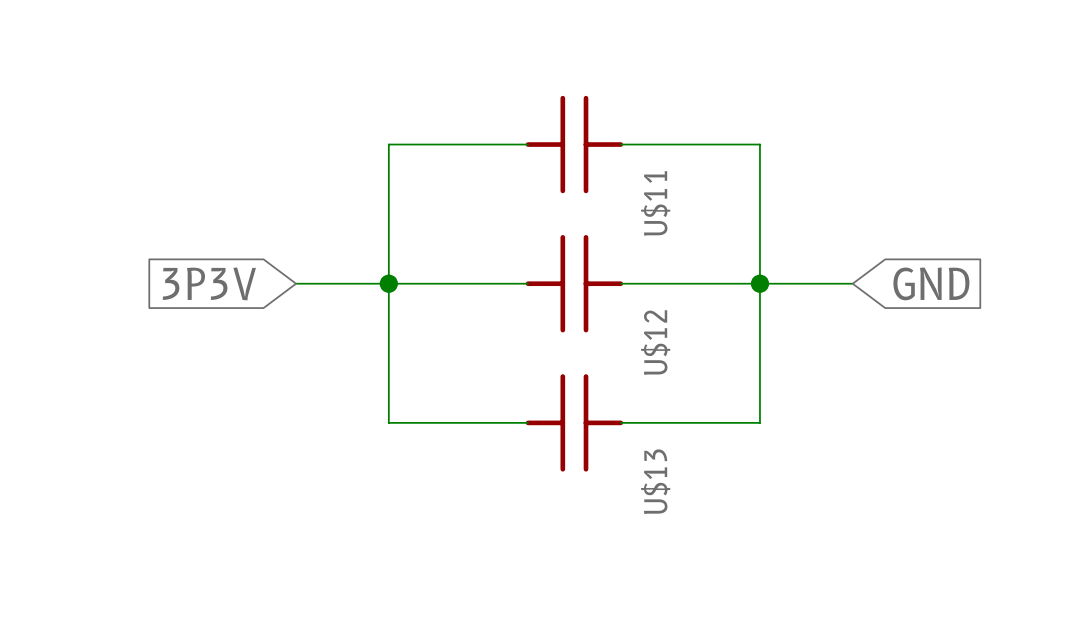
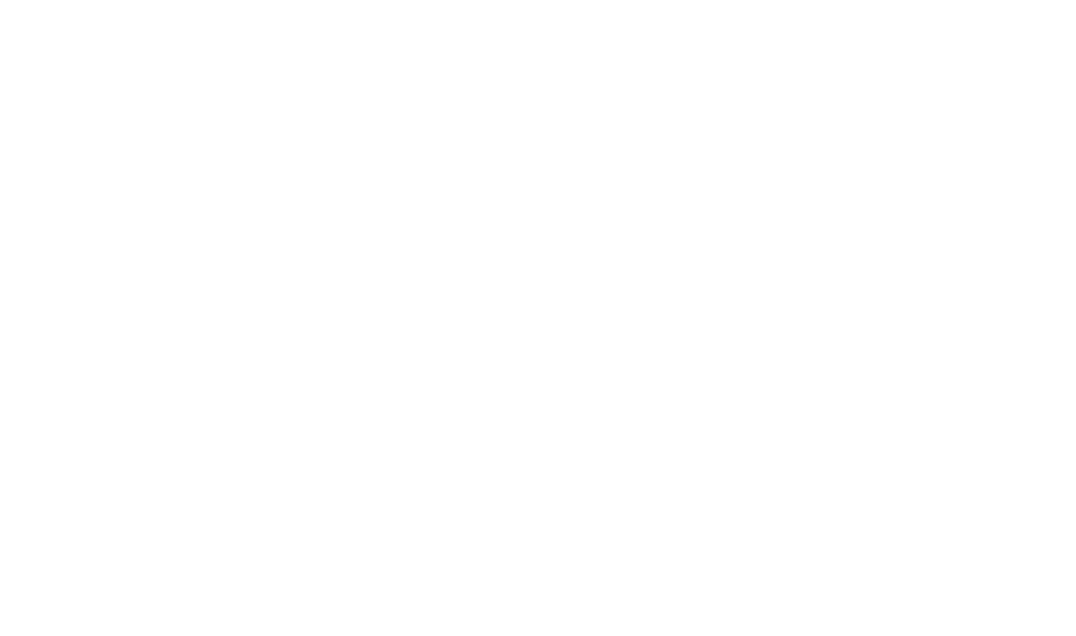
wire: (528, 144) (388, 144) (388, 422) (528, 422) -> none
U$11: (574, 144) -> none
wire: (620, 144) (759, 144) (759, 422) (620, 422) -> none
global label: 3P3V (209, 283) -> none
wire: (296, 283) (528, 283) -> none
junction: (388, 283) -> none
U$12: (574, 283) -> none
wire: (620, 283) (852, 283) -> none
junction: (759, 283) -> none
global label: GND (931, 283) -> none
U$13: (574, 422) -> none

